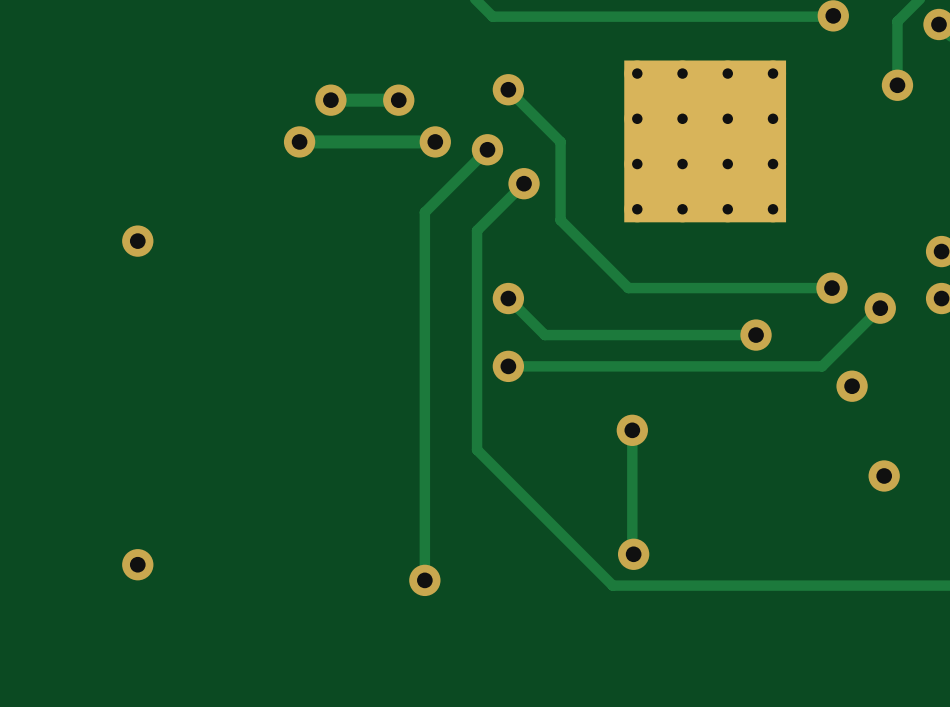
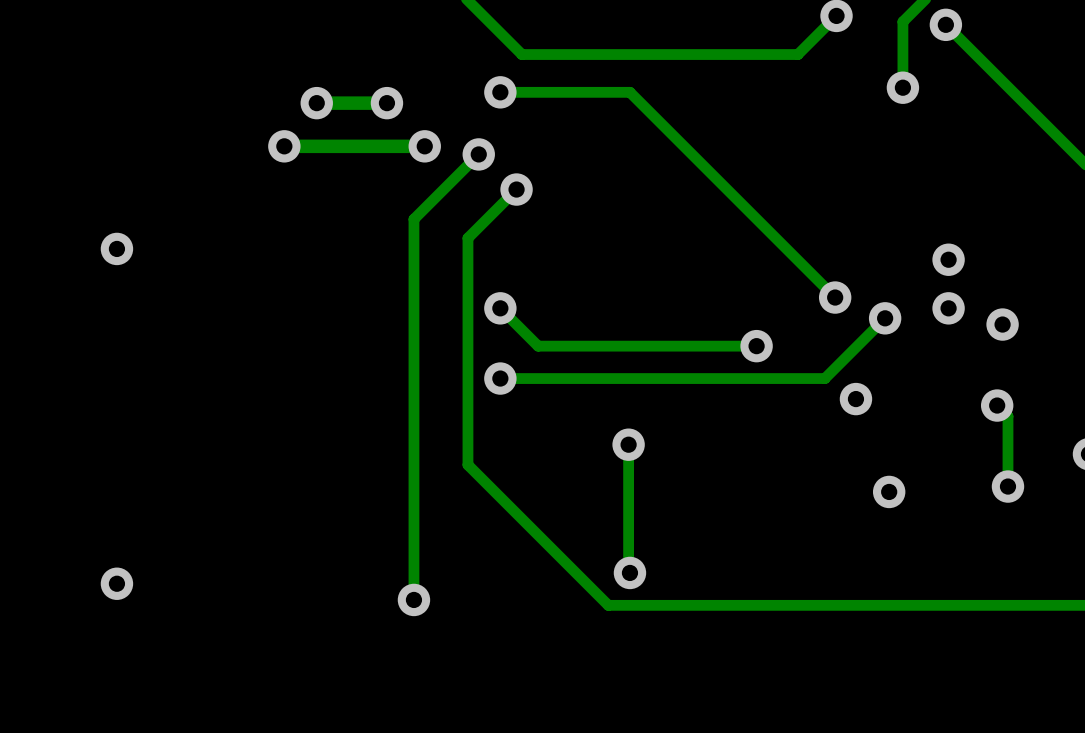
track: (832, 16) (492, 16) -> (835, 16) (797, 54) (521, 54) (484, 16)
track: (508, 89) (560, 141) (560, 220) (628, 288) (831, 288) -> (500, 92) (629, 92) (835, 297)
part: (705, 141) -> none

